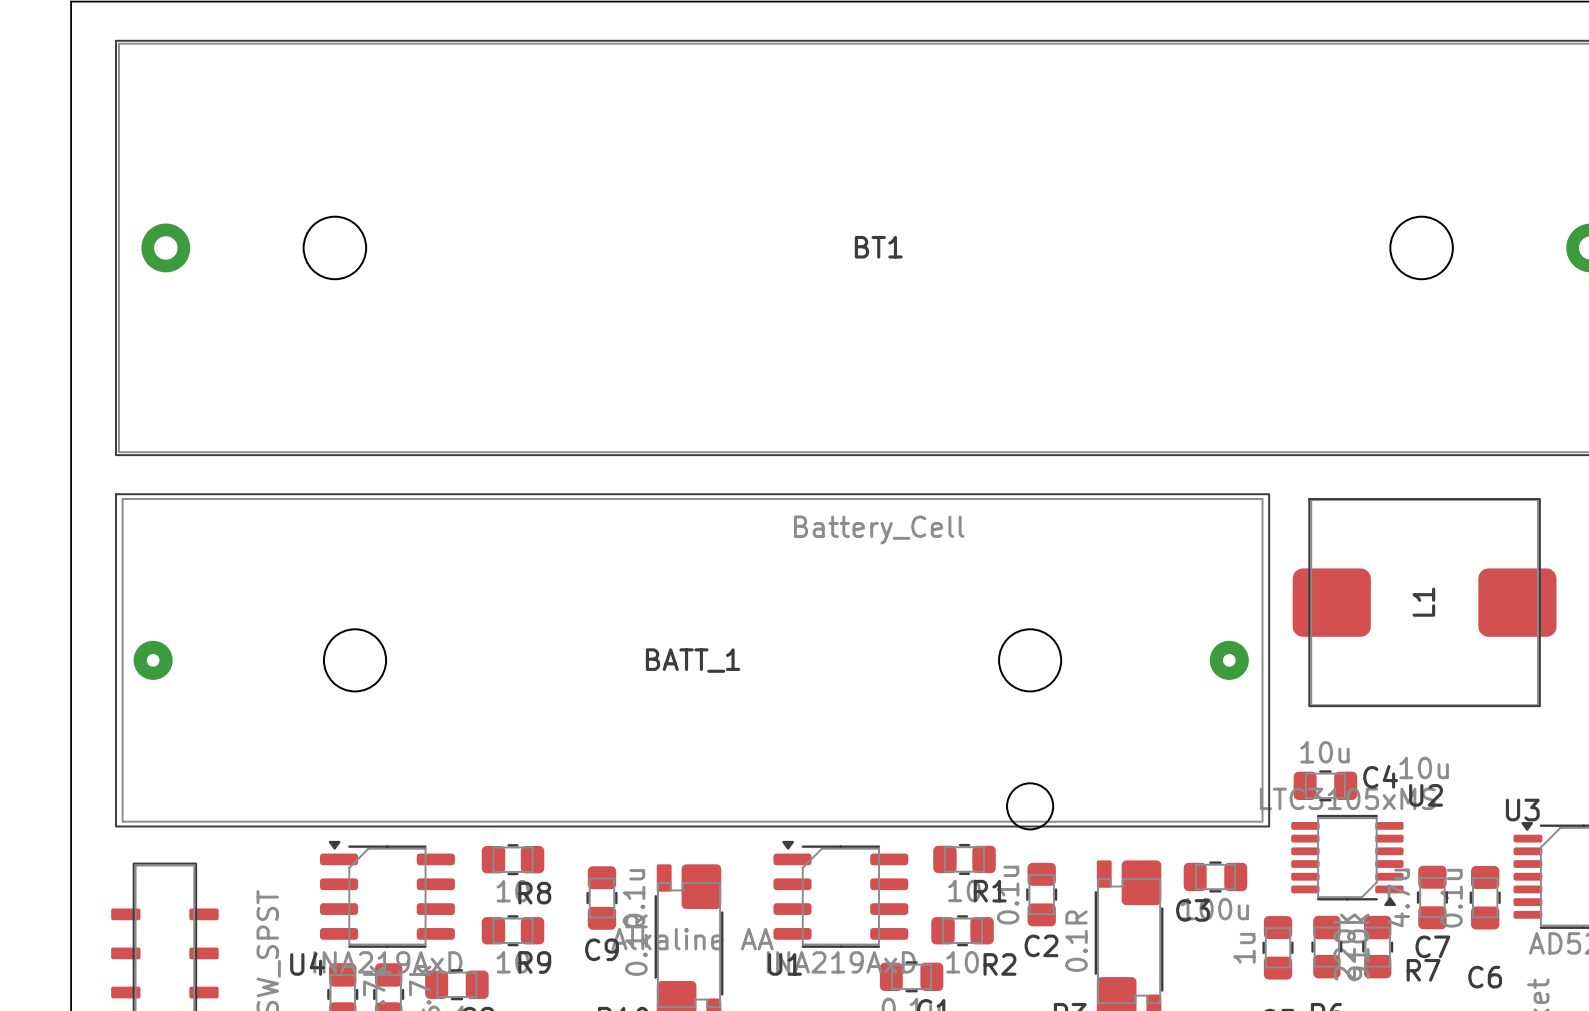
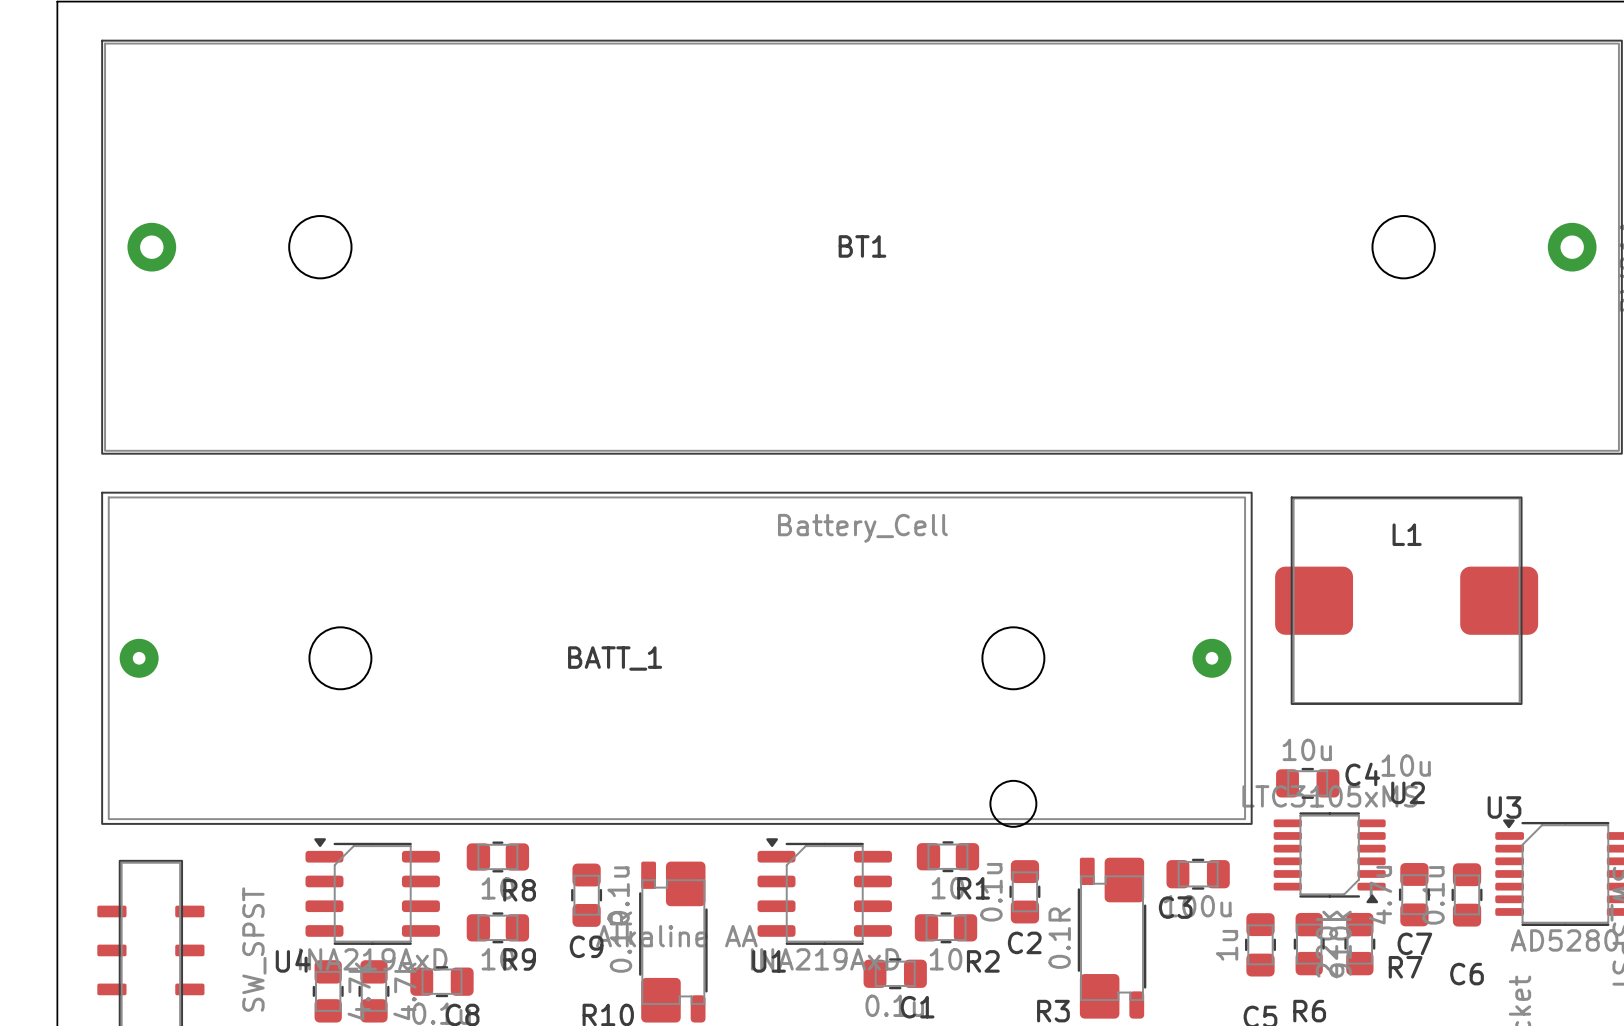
L1 name rotation: 0° (1423, 602) -> 90° clockwise (1407, 534)
L1 name position: L1 (1423, 602) -> L1 (1407, 534)
BATT_1 name position: BATT_1 (693, 660) -> BATT_1 (615, 658)

